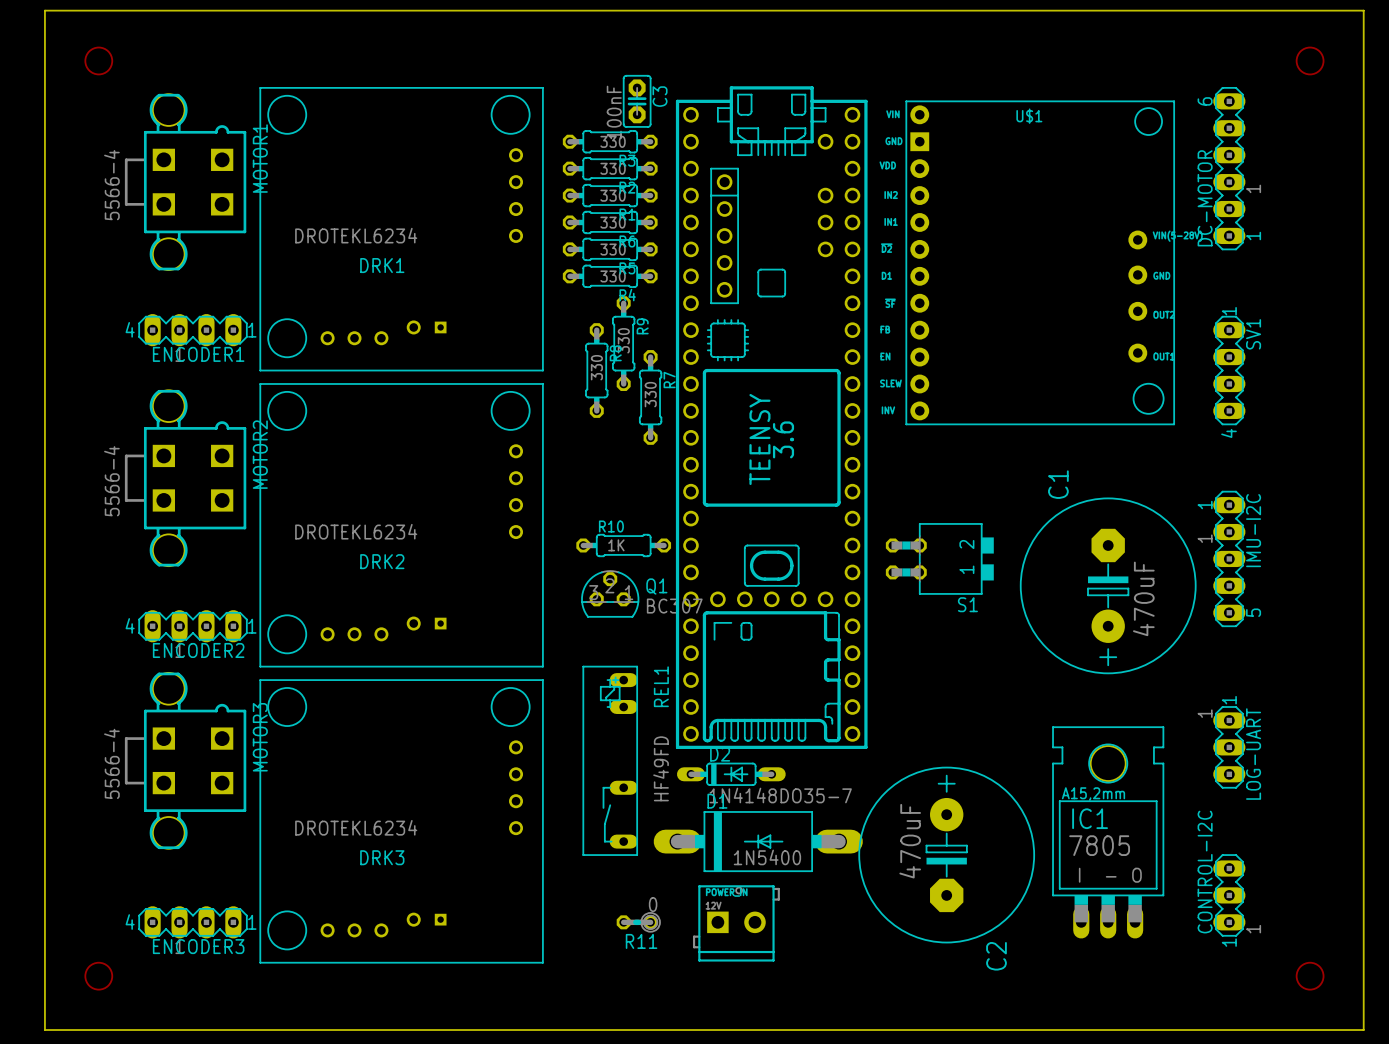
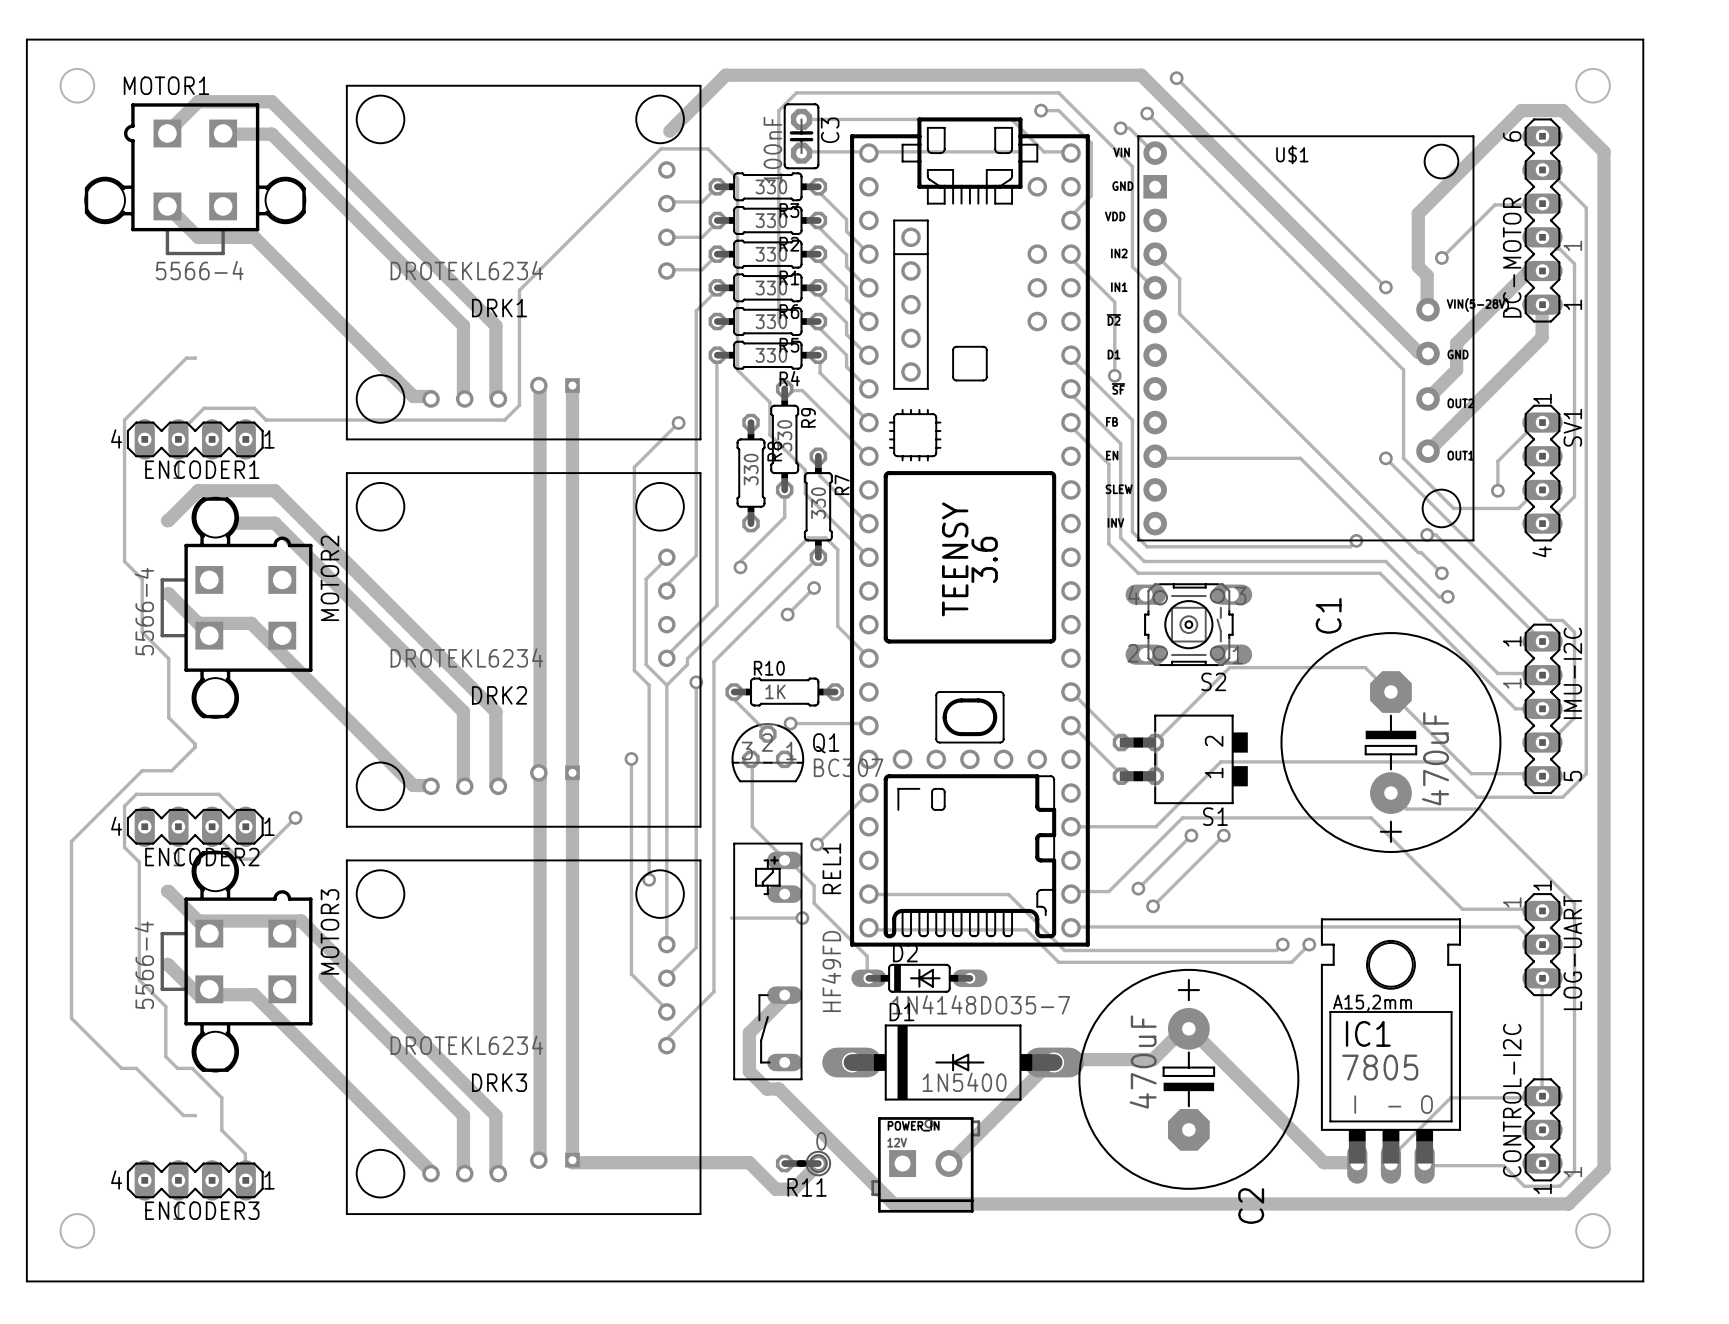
board edge: (44, 10) (1363, 10) (1363, 1030) (44, 1030) (44, 10) -> (26, 39) (26, 1281) (1643, 1281) (1643, 39) (26, 39)
track: none -> (1176, 78) (1385, 287)
via: none -> (1176, 78)
drawing position: (98, 60) -> (77, 85)
drawing position: (1310, 60) -> (1593, 85)
track: none -> (1041, 110) (1058, 110) (1091, 143) (1091, 196) (1073, 213) (1073, 219) (1070, 220)
via: none -> (1041, 110)
track: none -> (1147, 113) (1403, 369) (1403, 458) (1453, 508) (1518, 508) (1536, 490) (1542, 489)
via: none -> (1147, 113)
track: none -> (801, 119) (1011, 119) (1044, 151) (1070, 153)
track: none -> (1120, 128) (1129, 128) (1155, 153)
via: none -> (1120, 128)
track: none -> (669, 131) (725, 75) (1141, 75) (1418, 352) (1428, 353)
track: none -> (167, 133) (198, 101) (271, 101) (495, 325) (495, 396) (498, 398)
track: none -> (223, 133) (271, 134) (463, 325) (464, 398)
track: none -> (1017, 151) (801, 153)
track: none -> (1542, 169) (1545, 172) (1550, 172) (1586, 207) (1586, 773) (1562, 797) (1477, 797) (1441, 761) (1220, 761) (1156, 826) (1070, 826)
track: none -> (717, 186) (702, 201) (666, 201) (666, 203)
track: none -> (818, 186) (820, 187) (820, 193) (846, 219) (846, 231) (868, 254)
track: none -> (1542, 203) (1494, 204) (1441, 257)
track: none -> (167, 206) (198, 237) (254, 237) (413, 396) (431, 396) (431, 398)
track: none -> (717, 220) (702, 237) (666, 237)
track: none -> (818, 220) (820, 228) (846, 255) (846, 266) (868, 287)
MOTOR1 rotation: 0° (185, 182) -> 90° counterclockwise (195, 179)
track: none -> (1542, 237) (1545, 237) (1556, 249) (1559, 249) (1574, 263) (1574, 496) (1545, 526) (1542, 523)
track: none -> (717, 254) (702, 269) (666, 271)
track: none -> (818, 254) (820, 260) (846, 287) (846, 299) (868, 321)
track: none -> (1070, 254) (1073, 255) (1073, 260) (1114, 302) (1114, 375)
track: none -> (1155, 254) (1179, 278) (1179, 313) (1418, 552) (1421, 552) (1441, 573)
via: none -> (1441, 257)
track: none -> (1542, 271) (1542, 272) (1527, 272) (1456, 343) (1456, 369) (1428, 398)
track: none -> (717, 287) (696, 310) (696, 555) (666, 585) (666, 590)
track: none -> (818, 287) (820, 296) (846, 322) (846, 334) (868, 355)
track: none -> (1155, 287) (1132, 266) (1132, 166) (1058, 92) (796, 92) (778, 110) (778, 322)
via: none -> (1385, 287)
DRK1 position: (401, 229) -> (523, 262)
track: none -> (1542, 304) (1542, 337) (1428, 451)
track: none -> (1428, 309) (1427, 275) (1418, 266) (1418, 213) (1521, 110) (1562, 110) (1603, 151) (1603, 1168) (1568, 1203) (893, 1203) (778, 1089) (767, 1089) (749, 1071) (749, 1033) (784, 997) (784, 995)
track: none -> (818, 321) (820, 328) (846, 355) (846, 366) (868, 388)
track: none -> (717, 355) (716, 605) (666, 655) (666, 658)
track: none -> (818, 355) (820, 355) (820, 372) (868, 422)
track: none -> (1070, 355) (1073, 355) (1073, 361) (1132, 420) (1132, 532) (1147, 546) (1350, 546) (1356, 540)
track: none -> (195, 358) (186, 358) (124, 420) (124, 561) (142, 579) (142, 632) (168, 658) (168, 717) (195, 744) (195, 747) (171, 770) (142, 770) (71, 841) (71, 1018) (121, 1068) (136, 1068) (183, 1115) (195, 1115)
via: none -> (1114, 375)
track: none -> (538, 385) (538, 1160)
track: none -> (572, 385) (572, 1162) (749, 1162) (775, 1189) (793, 1189) (818, 1163)
track: none -> (784, 388) (784, 390) (802, 390) (868, 456)
track: none -> (1070, 388) (1073, 390) (1073, 396) (1120, 443) (1120, 537) (1144, 561) (1385, 561) (1497, 673) (1542, 673) (1542, 675)
ENCODER1 position: (193, 330) -> (195, 439)
track: none -> (678, 422) (634, 467) (634, 670) (649, 685) (649, 879)
via: none -> (678, 422)
track: none -> (1070, 422) (1073, 422) (1073, 428) (1108, 464) (1108, 543) (1138, 573) (1380, 573) (1515, 708) (1542, 708)
track: none -> (1542, 422) (1536, 422) (1497, 461) (1497, 490)
track: none -> (178, 439) (180, 437) (180, 431) (204, 408) (254, 408) (266, 420) (504, 420) (519, 405) (519, 290) (660, 148) (708, 148) (737, 178) (737, 369) (769, 402) (769, 434) (805, 470) (805, 493) (868, 557)
track: none -> (818, 456) (820, 476) (868, 523)
track: none -> (1155, 456) (1156, 458) (1300, 458) (1438, 596) (1447, 596)
track: none -> (1385, 458) (1547, 620) (1562, 620) (1574, 632) (1574, 717) (1550, 741) (1542, 742)
via: none -> (1385, 458)
track: none -> (784, 489) (784, 517) (740, 561) (740, 567)
via: none -> (1497, 490)
track: none -> (167, 520) (198, 490) (274, 490) (495, 711) (495, 785) (498, 786)
track: none -> (223, 520) (224, 523) (274, 523) (463, 711) (464, 786)
track: none -> (1427, 534) (1436, 534) (1542, 641)
via: none -> (1427, 534)
via: none -> (1356, 540)
track: none -> (666, 557) (646, 579) (646, 664) (666, 685)
track: none -> (818, 557) (713, 661) (713, 991) (666, 1038) (666, 1045)
via: none -> (740, 567)
via: none -> (1441, 573)
track: none -> (814, 588) (787, 614)
via: none -> (814, 588)
track: none -> (167, 593) (198, 623) (251, 623) (413, 785) (431, 786)
via: none -> (1447, 596)
via: none -> (787, 614)
S2: none -> (1188, 624)
track: none -> (868, 658) (837, 626) (837, 549) (825, 537) (808, 537) (687, 658) (687, 664) (666, 685)
DRK2 position: (401, 525) -> (523, 649)
track: none -> (696, 682) (696, 947) (666, 978)
via: none -> (696, 682)
track: none -> (666, 685) (666, 944)
track: none -> (734, 692) (734, 700) (767, 734)
track: none -> (1070, 692) (1121, 742)
S1 position: (939, 558) -> (1180, 759)
track: none -> (790, 723) (867, 723) (868, 725)
via: none -> (790, 723)
track: none -> (1070, 725) (1121, 776)
track: none -> (631, 758) (631, 974) (666, 1009) (666, 1011)
via: none -> (631, 758)
track: none -> (751, 759) (752, 826) (784, 859) (784, 862) (790, 862) (814, 885) (814, 903) (867, 956) (867, 977) (868, 978)
track: none -> (1155, 776) (1156, 741) (1229, 667) (1365, 667) (1471, 773) (1542, 773) (1542, 776)
ENCODER2 position: (193, 626) -> (195, 826)
track: none -> (868, 793) (817, 844)
track: none -> (1390, 793) (1406, 809) (1480, 809) (1574, 903) (1574, 1171) (1559, 1186) (1524, 1186) (1503, 1165) (1427, 1165) (1424, 1163)
track: none -> (295, 817) (254, 859) (239, 859) (212, 832) (212, 826)
via: none -> (295, 817)
track: none -> (245, 826) (245, 820) (218, 794) (136, 794) (124, 806) (124, 847) (139, 862) (139, 979) (165, 1006) (165, 1056) (177, 1068) (192, 1068) (221, 1097) (221, 1130) (245, 1153) (245, 1180)
track: none -> (1191, 835) (1138, 888)
via: none -> (1191, 835)
track: none -> (1223, 835) (1153, 906)
via: none -> (1223, 835)
via: none -> (817, 844)
via: none -> (649, 879)
via: none -> (1138, 888)
track: none -> (167, 891) (198, 921) (301, 921) (495, 1115) (495, 1171) (498, 1173)
track: none -> (868, 894) (1008, 894) (1064, 950) (1276, 950) (1282, 944)
track: none -> (1070, 894) (1073, 891) (1108, 891) (1182, 817) (1371, 817) (1462, 909) (1542, 909) (1542, 910)
via: none -> (1153, 906)
track: none -> (731, 918) (802, 918)
via: none -> (802, 918)
track: none -> (868, 927) (870, 929) (1026, 929) (1058, 962) (1291, 962) (1309, 944)
track: none -> (1070, 927) (1518, 926) (1536, 944) (1542, 944)
via: none -> (1282, 944)
via: none -> (1309, 944)
track: none -> (167, 964) (198, 994) (254, 994) (431, 1173)
track: none -> (324, 977) (463, 1115) (464, 1173)
track: none -> (1542, 978) (1542, 1097) (1450, 1097) (1391, 1156) (1390, 1163)
DRK3 position: (401, 821) -> (523, 1037)
ENCODER3 position: (193, 922) -> (195, 1180)
track: none -> (948, 1163) (1049, 1062) (1058, 1059) (1153, 1059) (1182, 1030) (1188, 1028) (1324, 1162) (1357, 1163)
drawing position: (98, 976) -> (77, 1230)
drawing position: (1310, 976) -> (1593, 1230)

